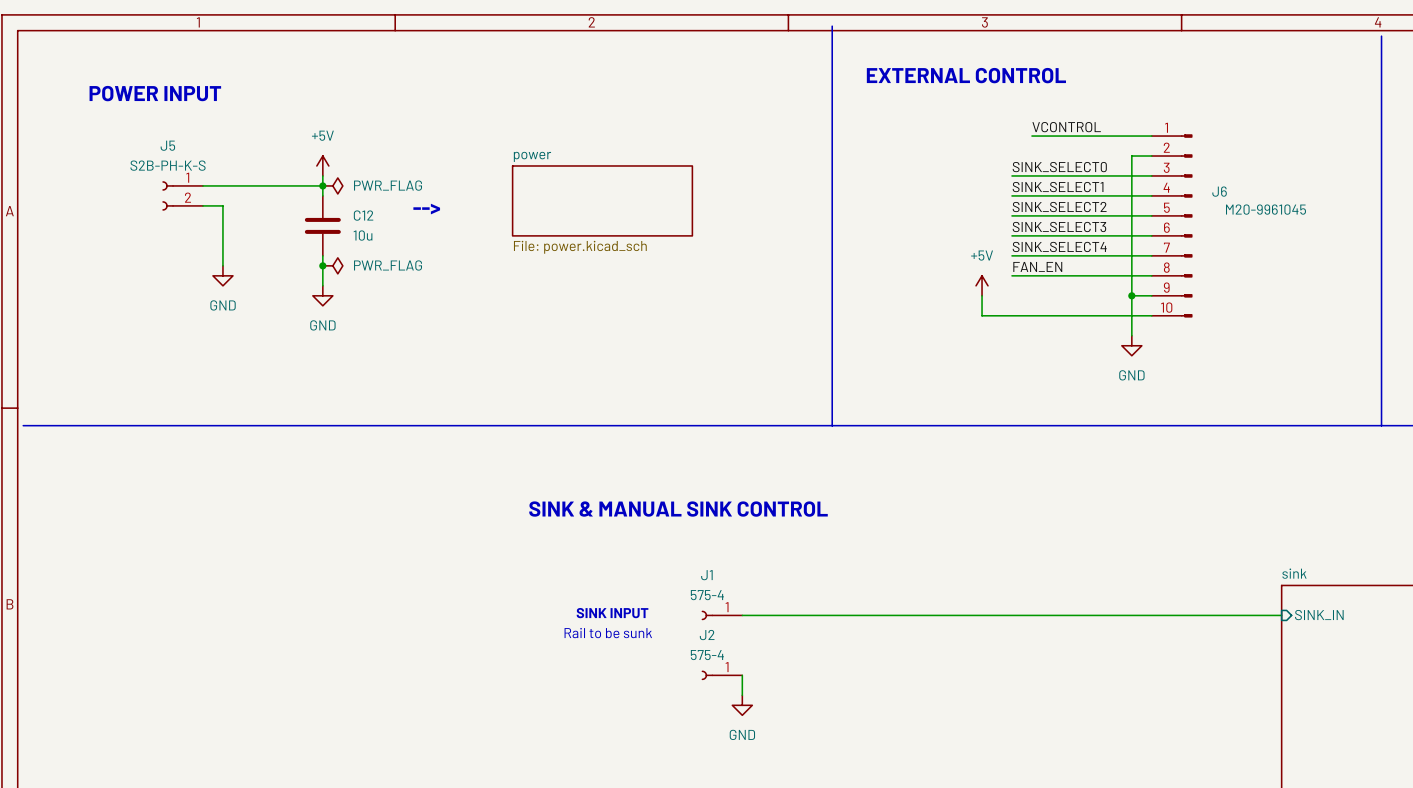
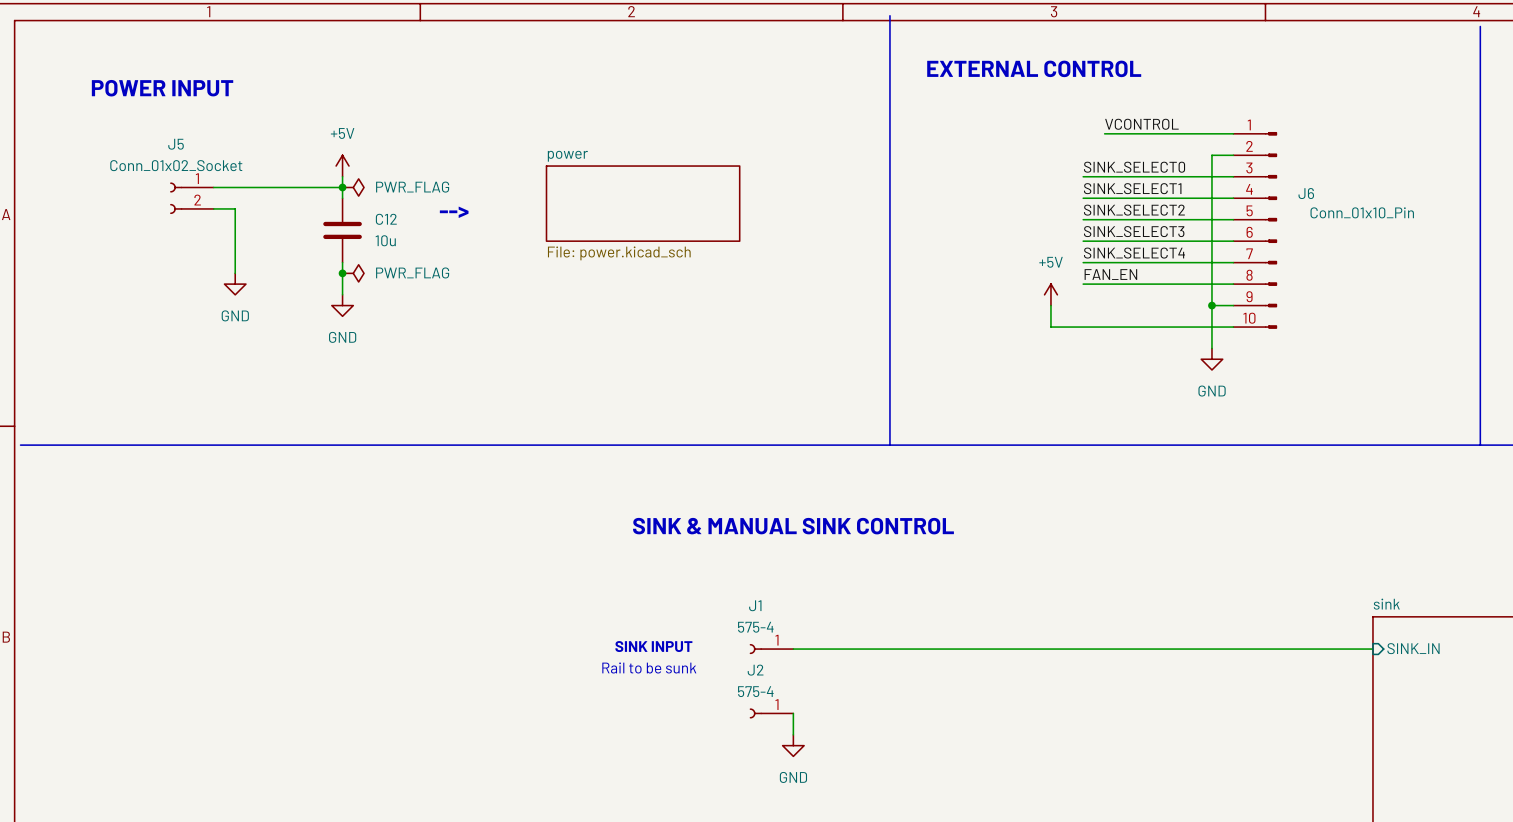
J5 value: S2B-PH-K-S (168, 165) -> Conn_01x02_Socket (176, 165)
J6 value: M20-9961045 (1265, 209) -> Conn_01x10_Pin (1362, 212)
text position: SINK & MANUAL SINK CONTROL (678, 509) -> SINK & MANUAL SINK CONTROL (793, 526)

